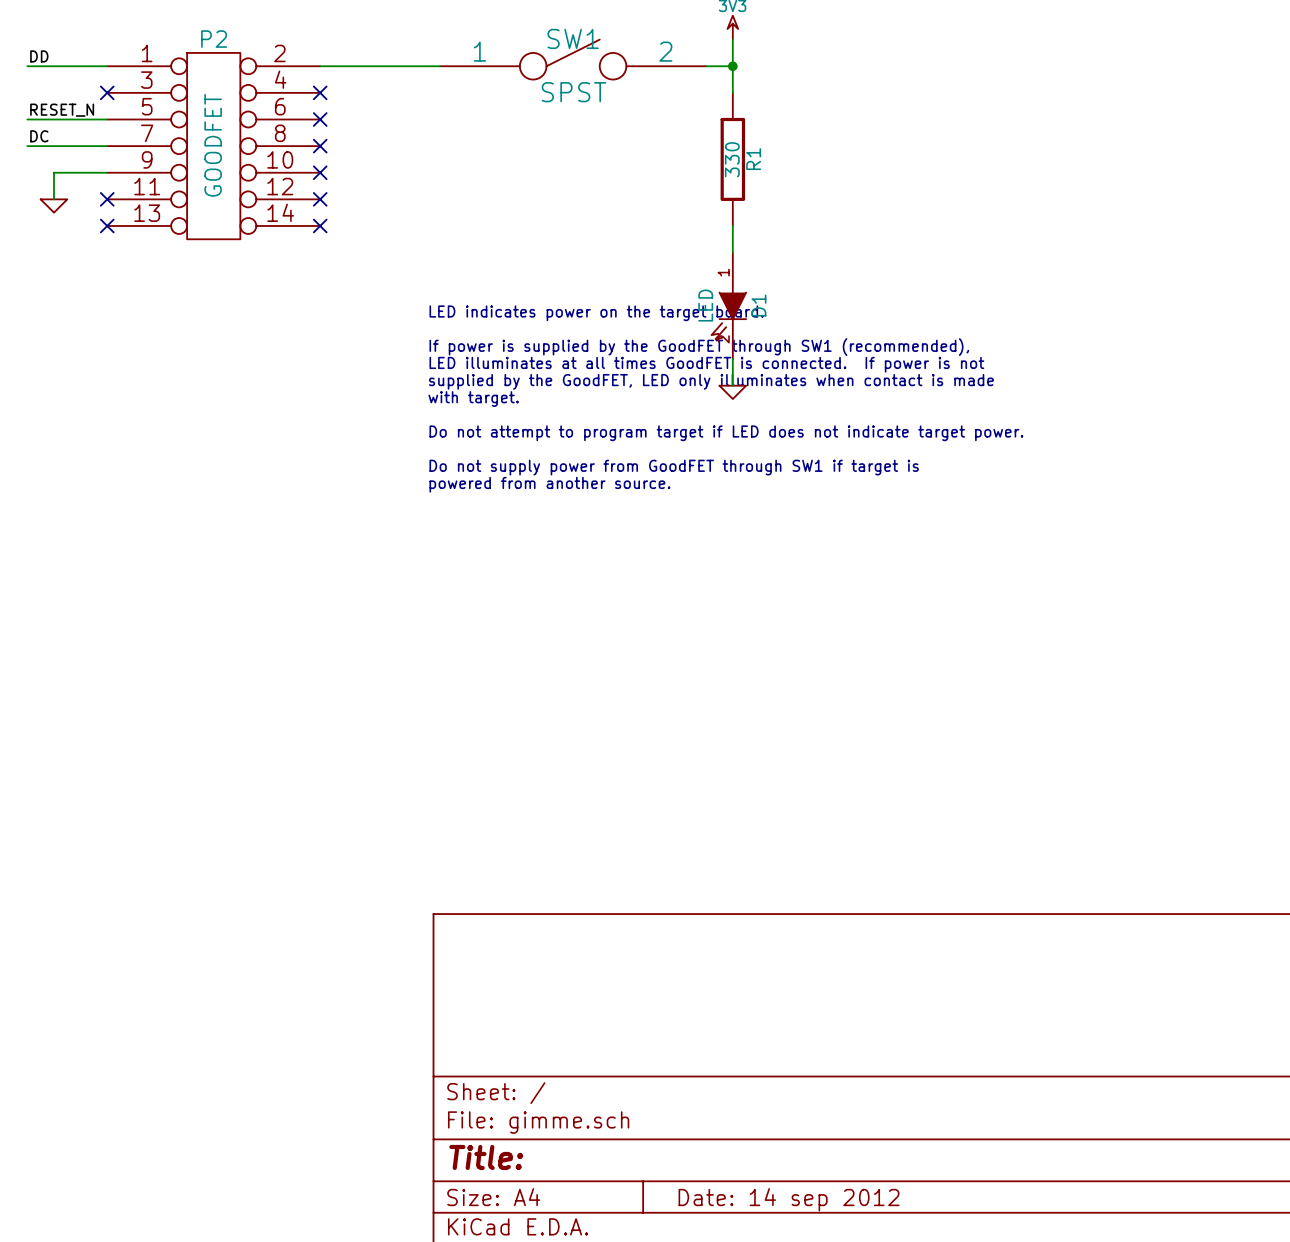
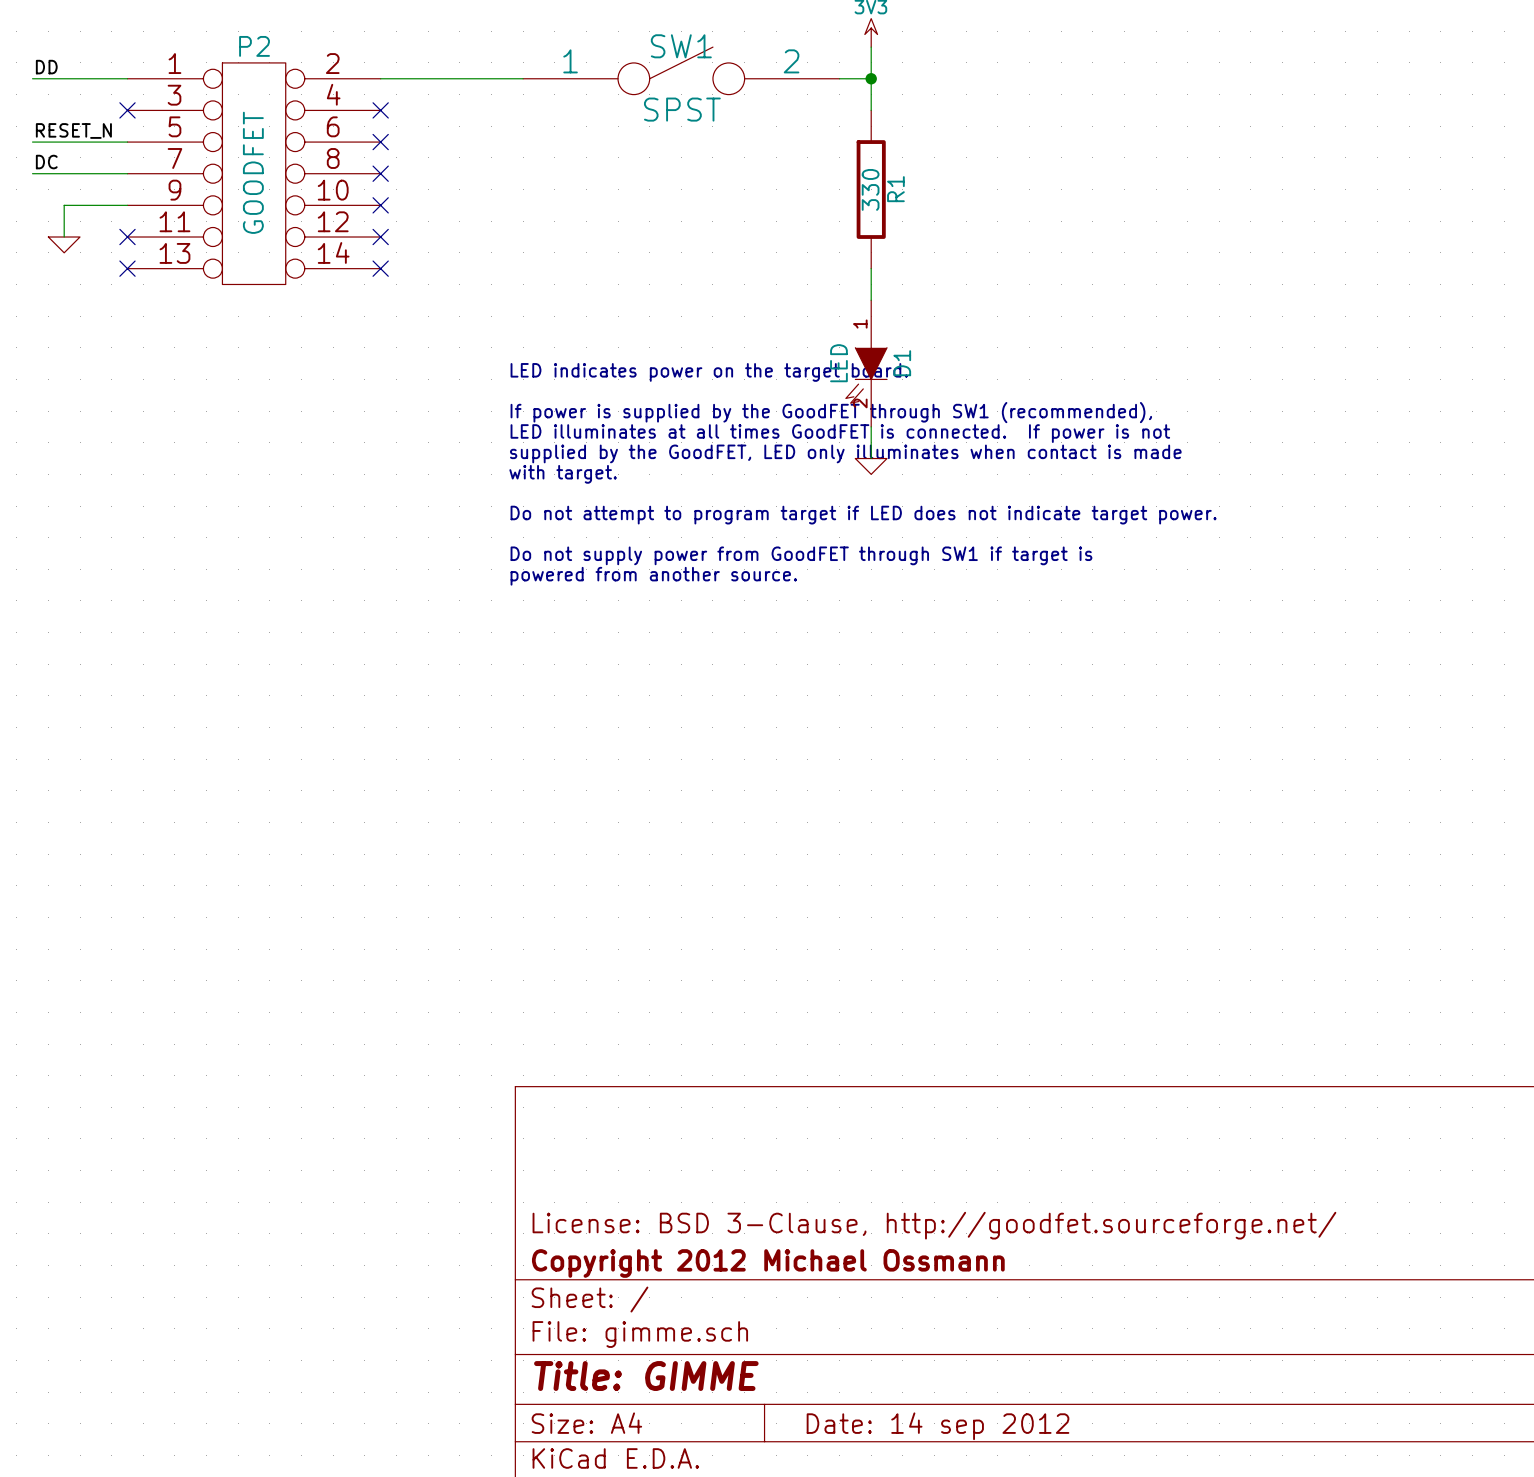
title block: none -> License: BSD 3-Clause, http://goodfet.sourceforge.net/ (934, 1225)
title block: none -> Copyright 2012 Michael Ossmann (768, 1263)
title block: Title: (486, 1157) -> Title: GIMME (646, 1376)

